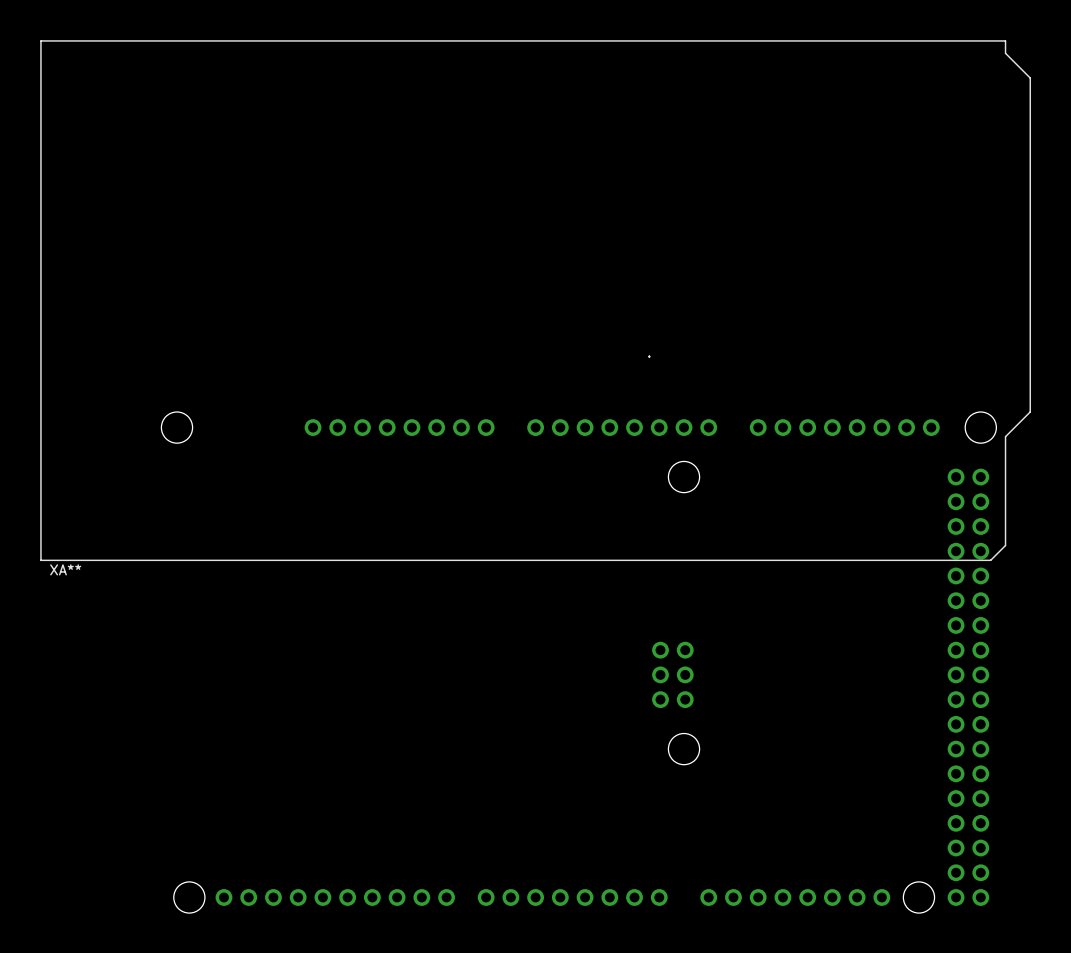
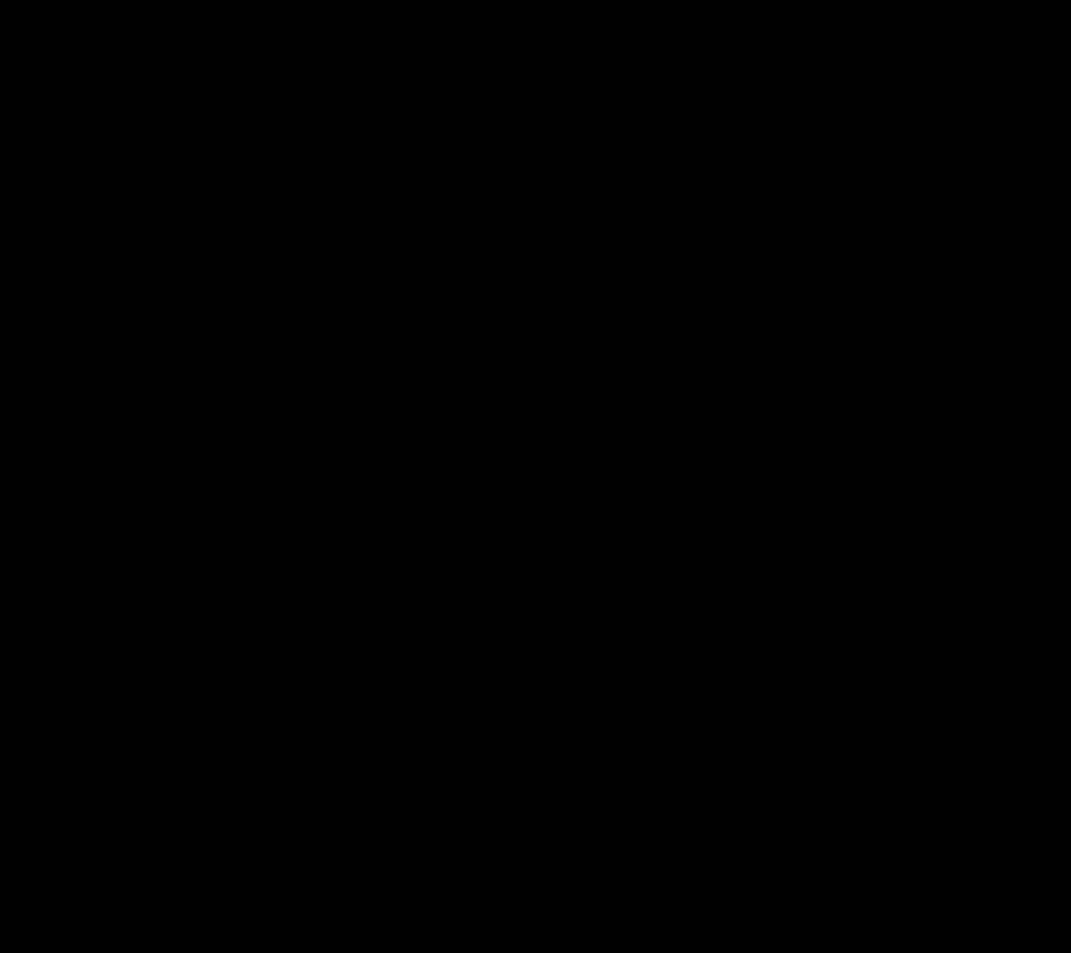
XA**: (535, 476) -> none

